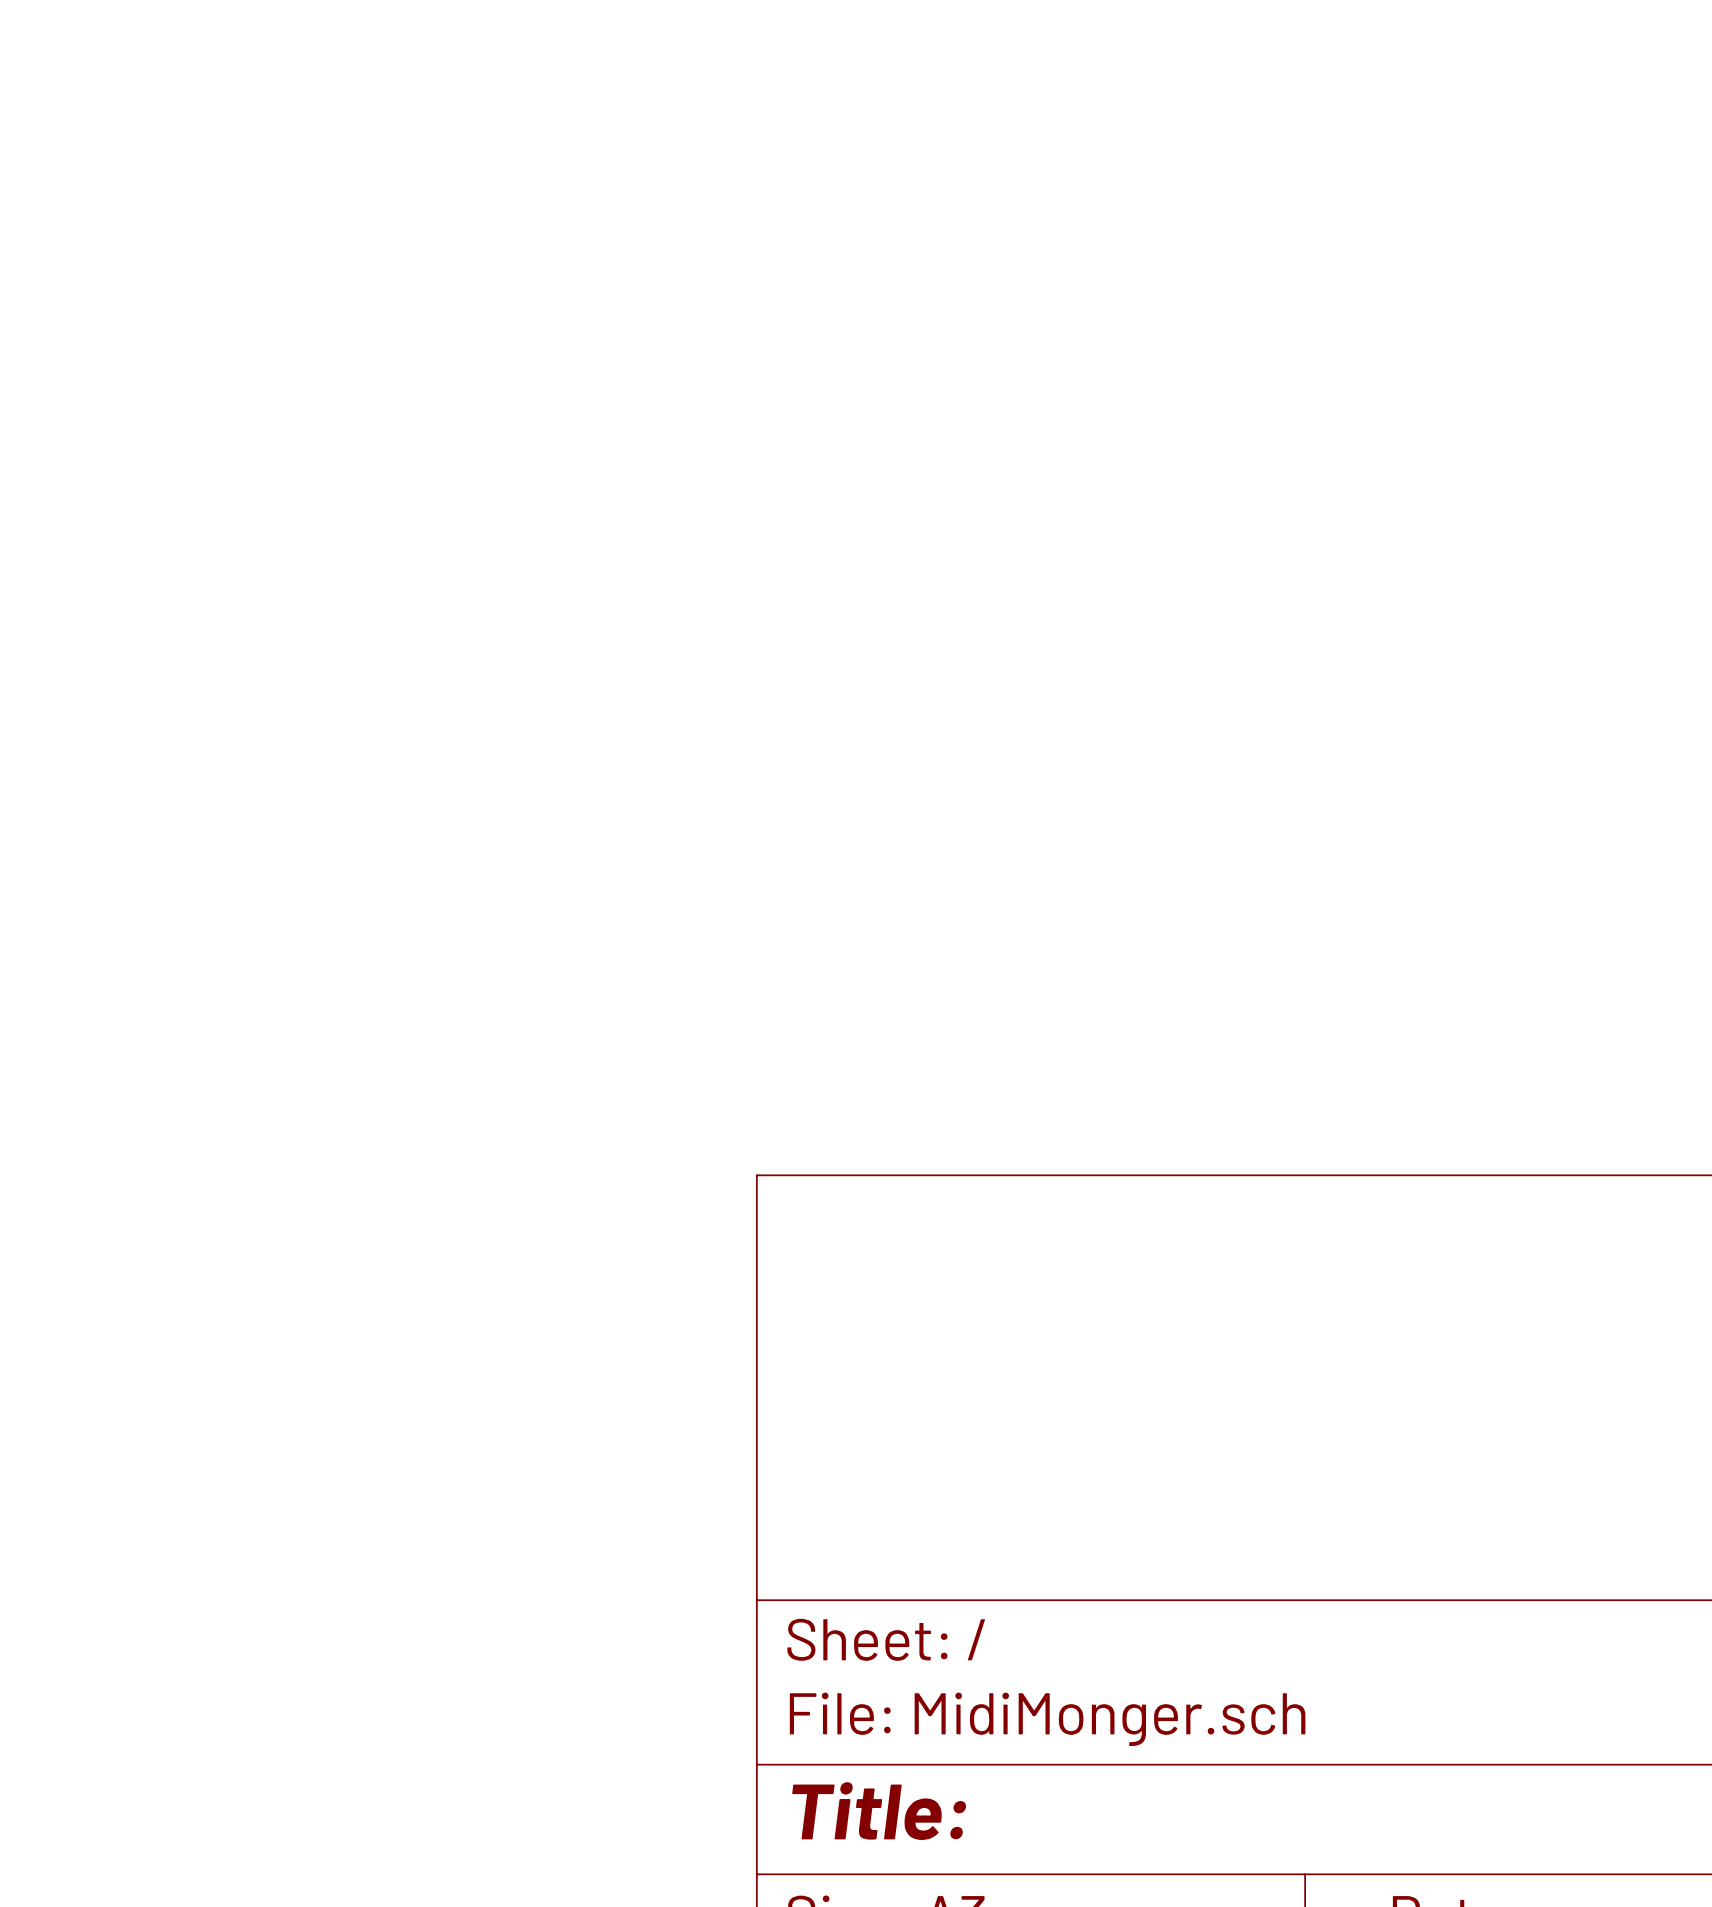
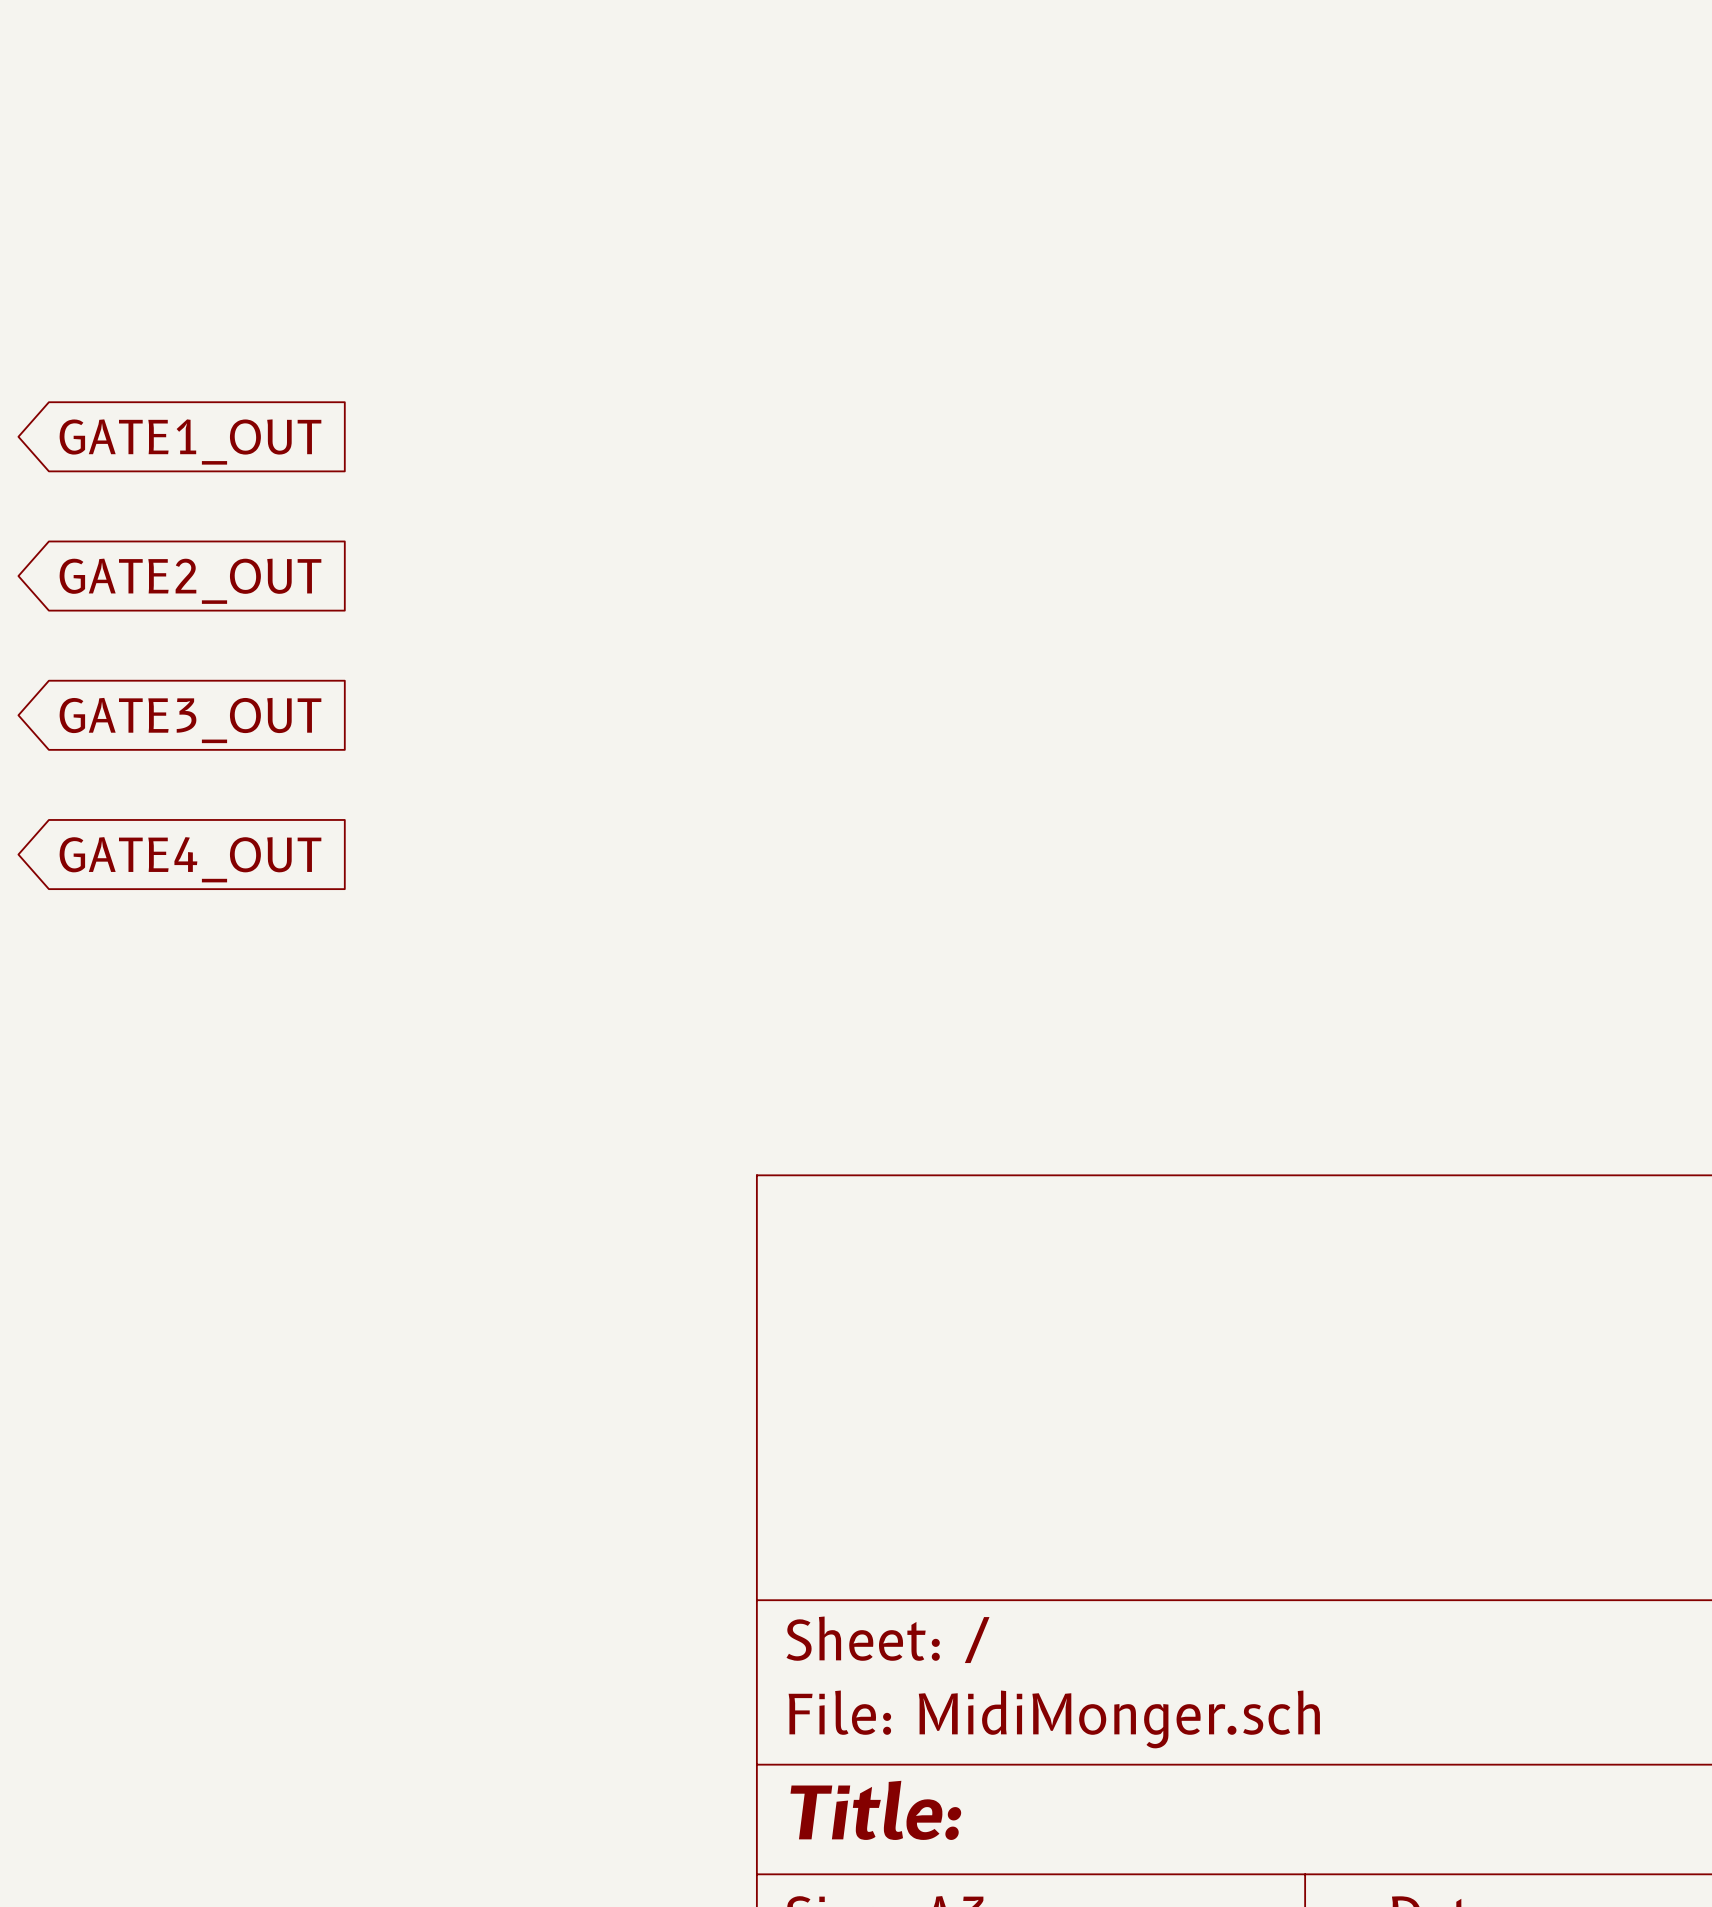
global label: none -> GATE1_OUT (190, 442)
global label: none -> GATE2_OUT (190, 581)
global label: none -> GATE3_OUT (190, 720)
global label: none -> GATE4_OUT (190, 859)

